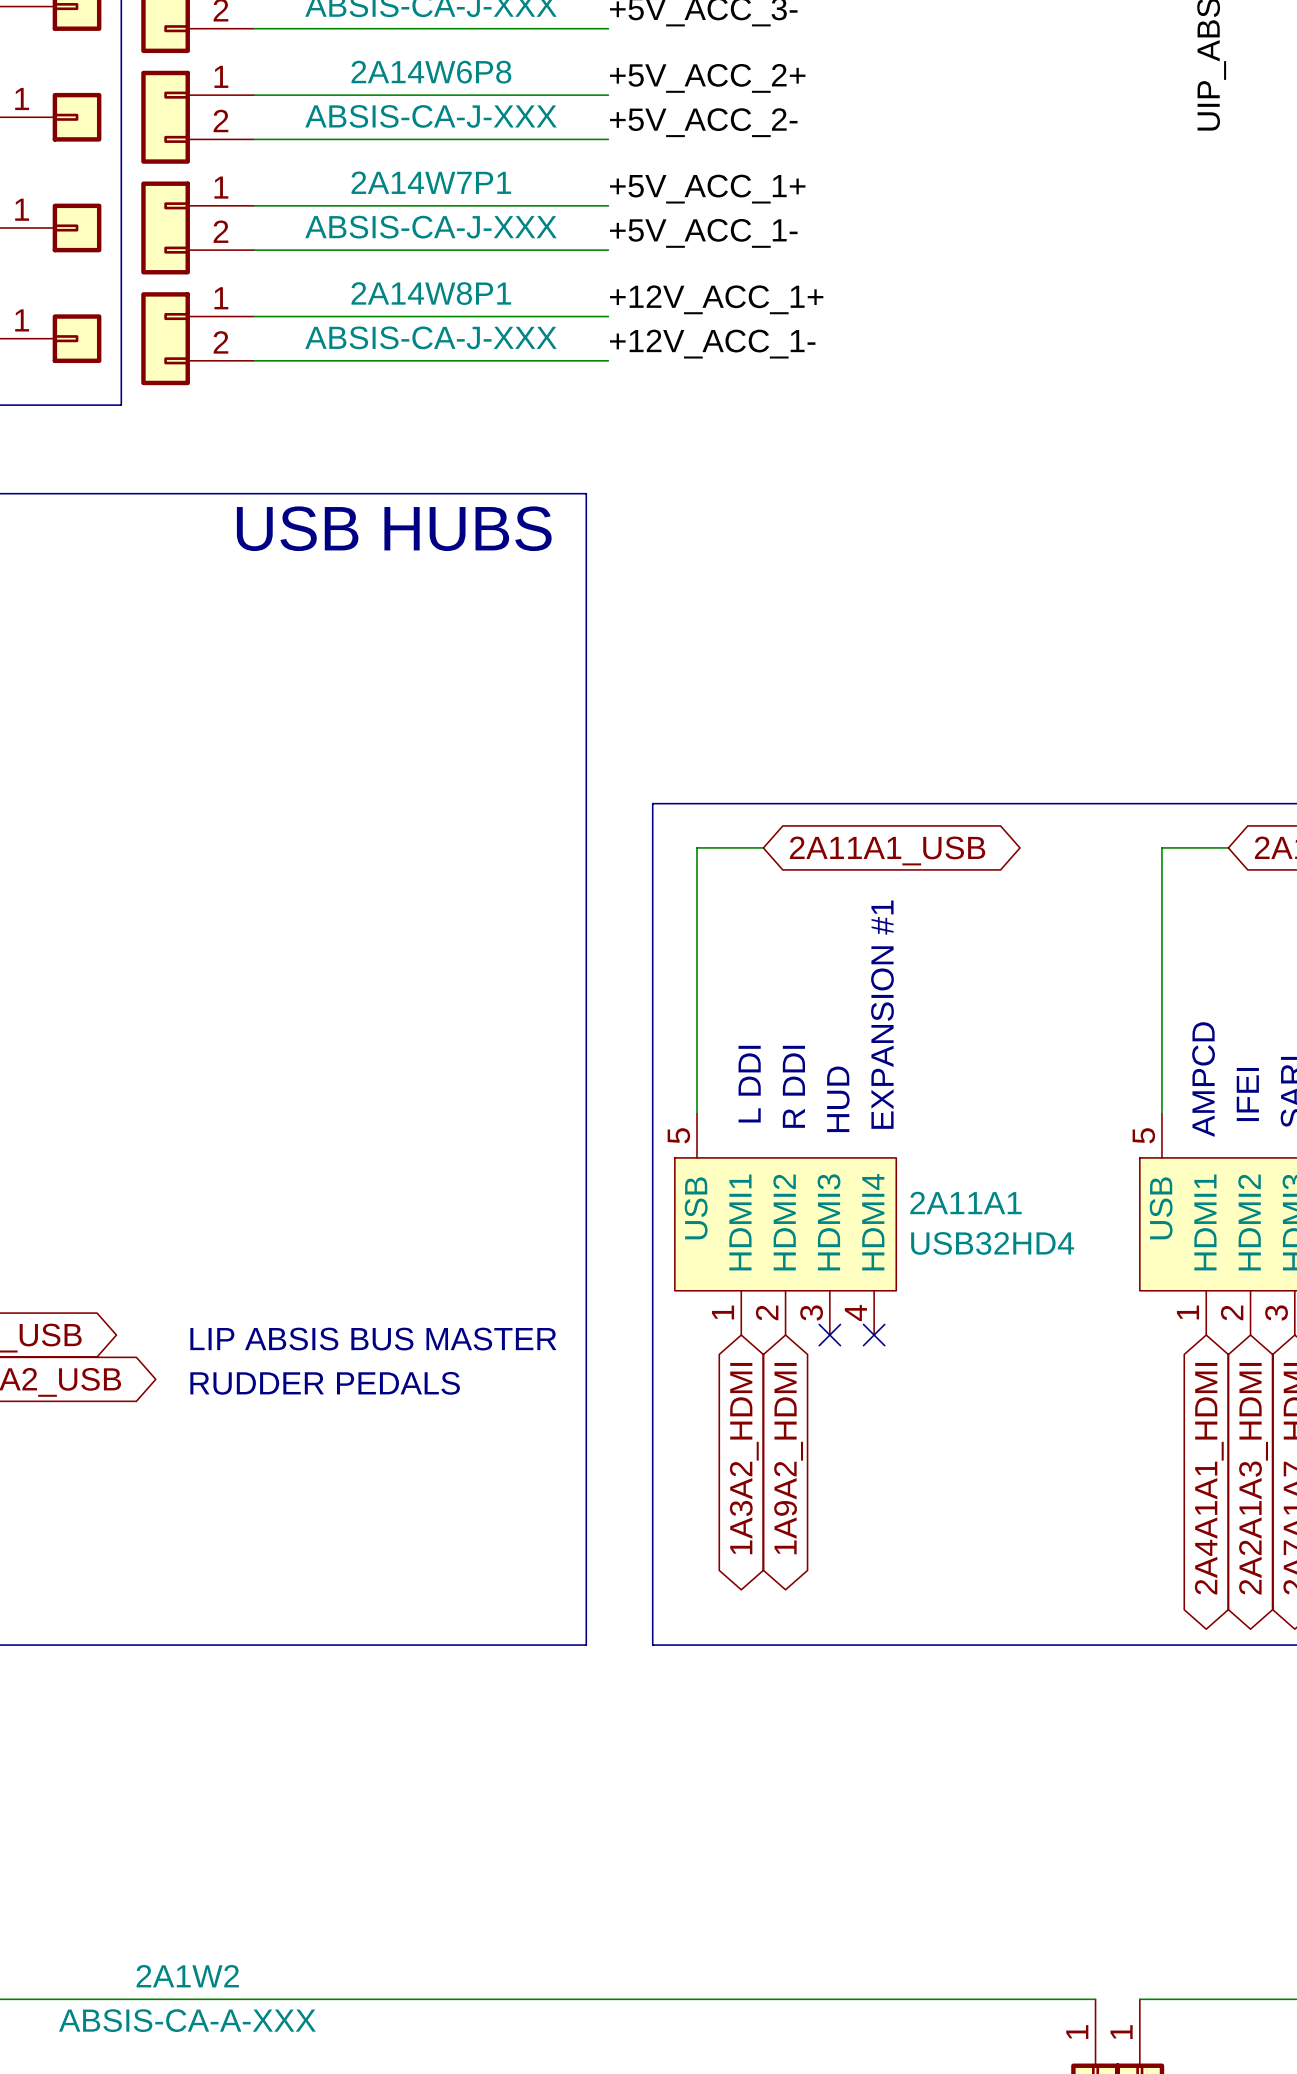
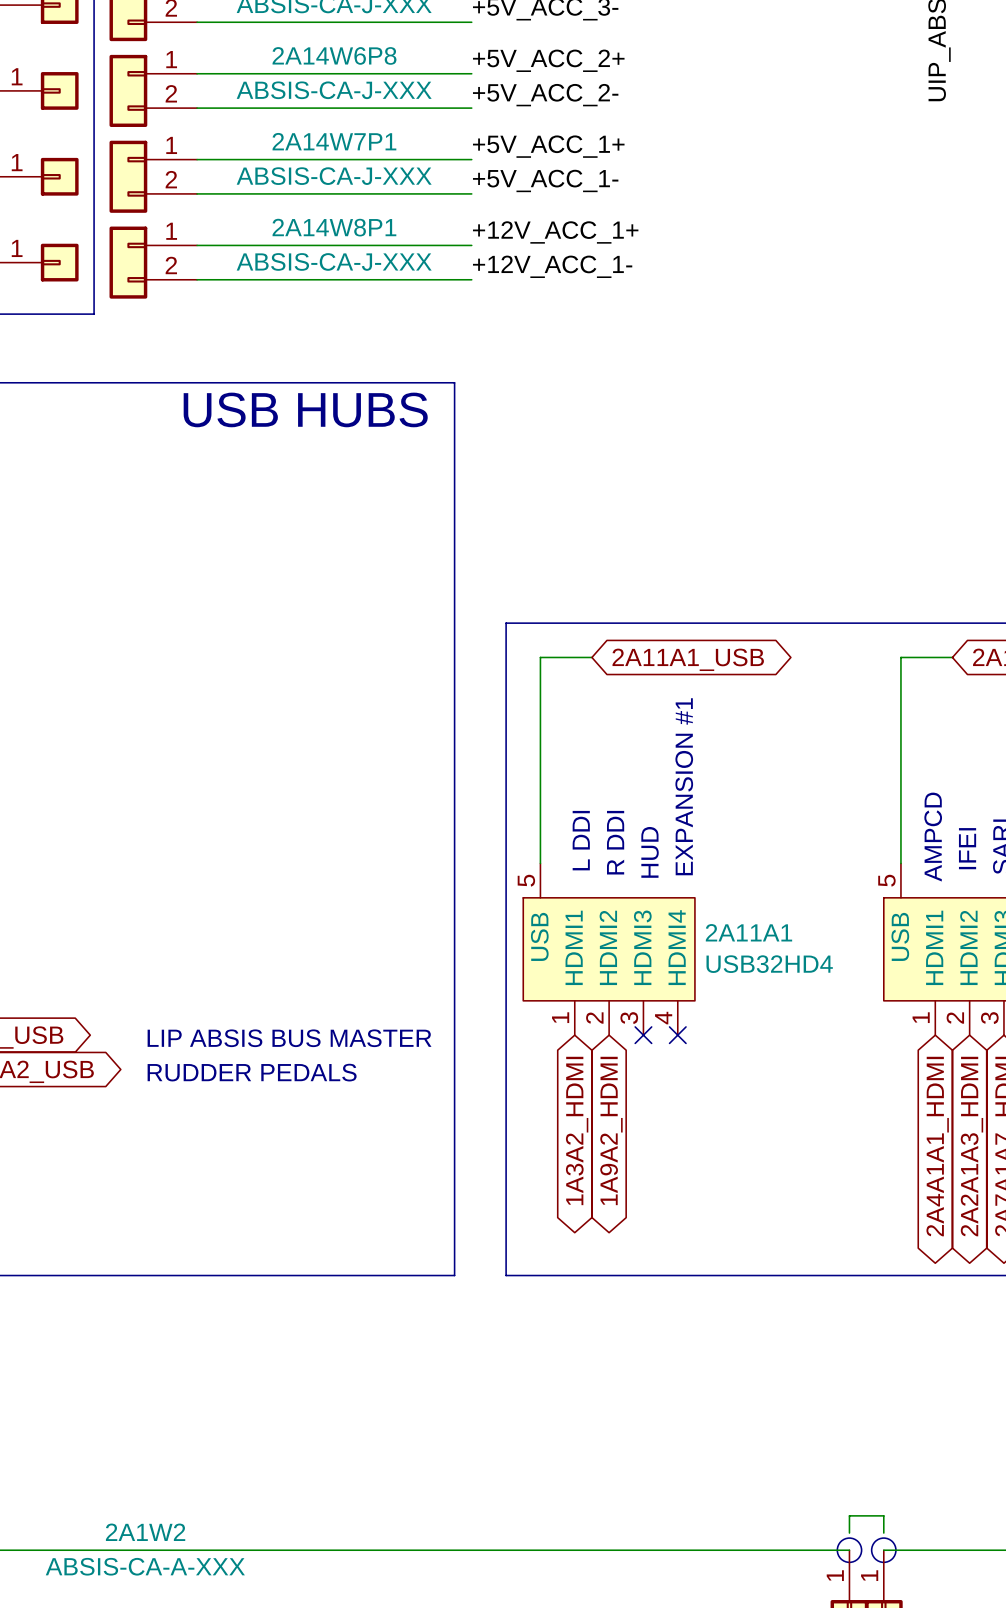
wire: none -> (849, 1533) (849, 1515) (883, 1515) (883, 1533)
drawing: none -> [837, 1538, 896, 1563]

